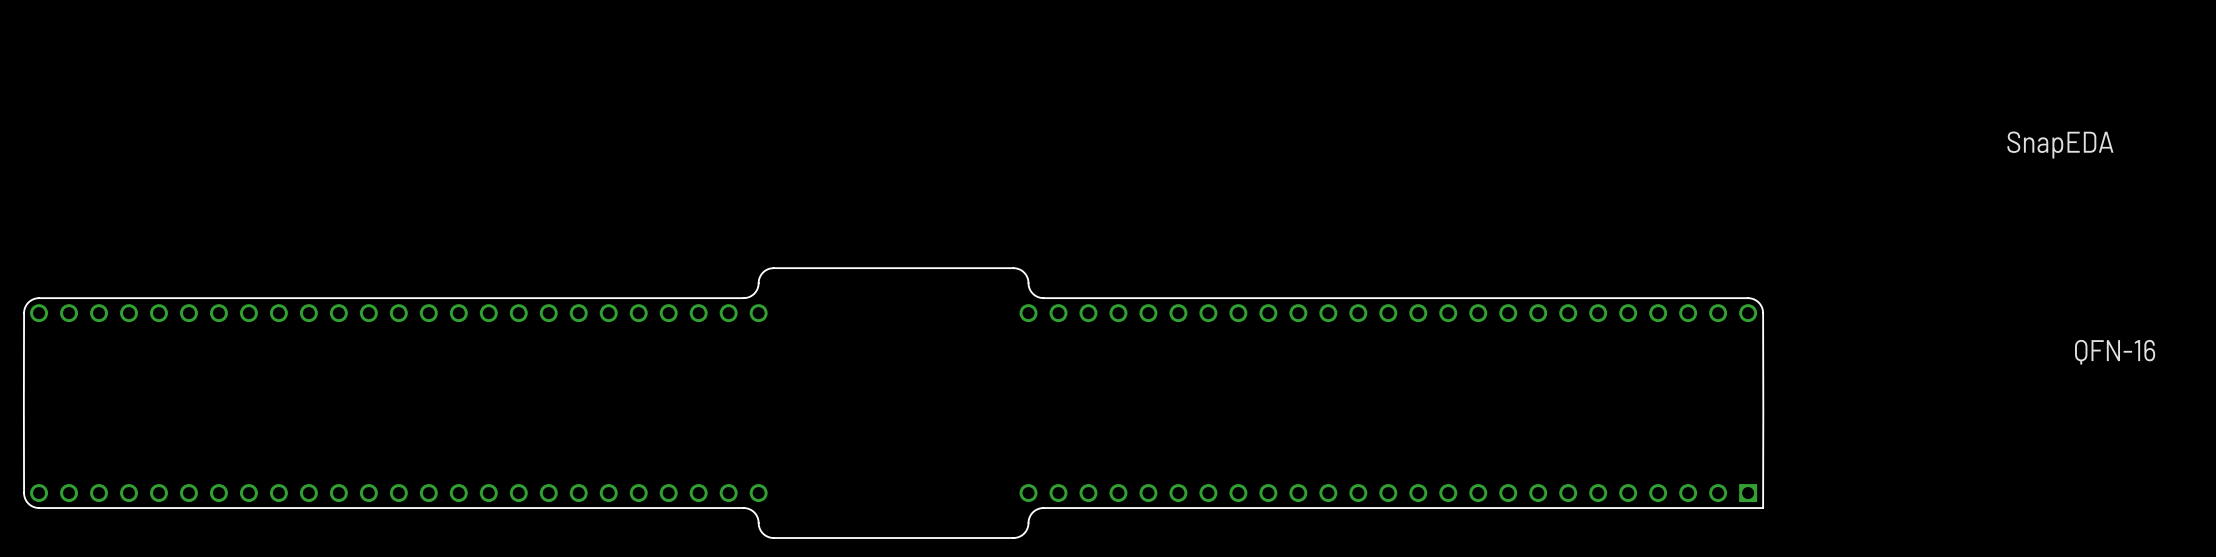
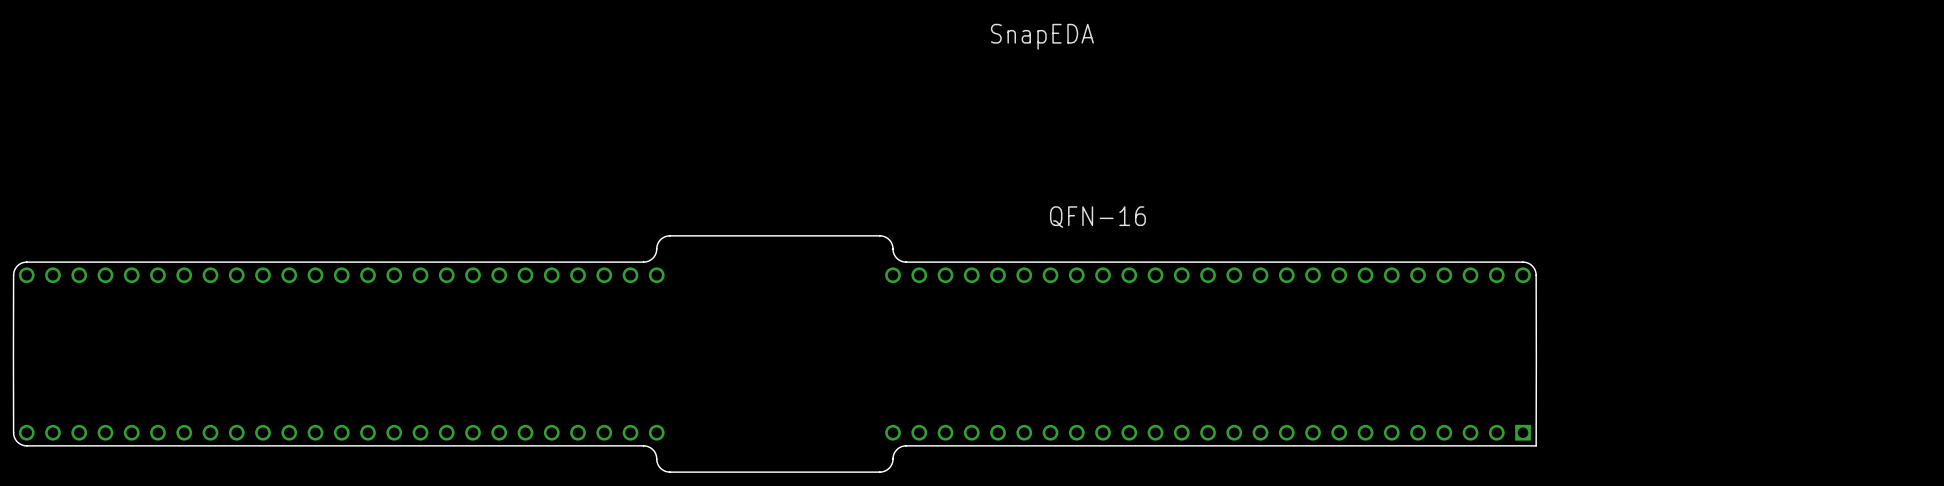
text: none -> SnapEDA (1042, 36)
text: SnapEDA (2060, 145) -> none
text: none -> QFN-16 (1097, 217)
text: QFN-16 (2115, 352) -> none

